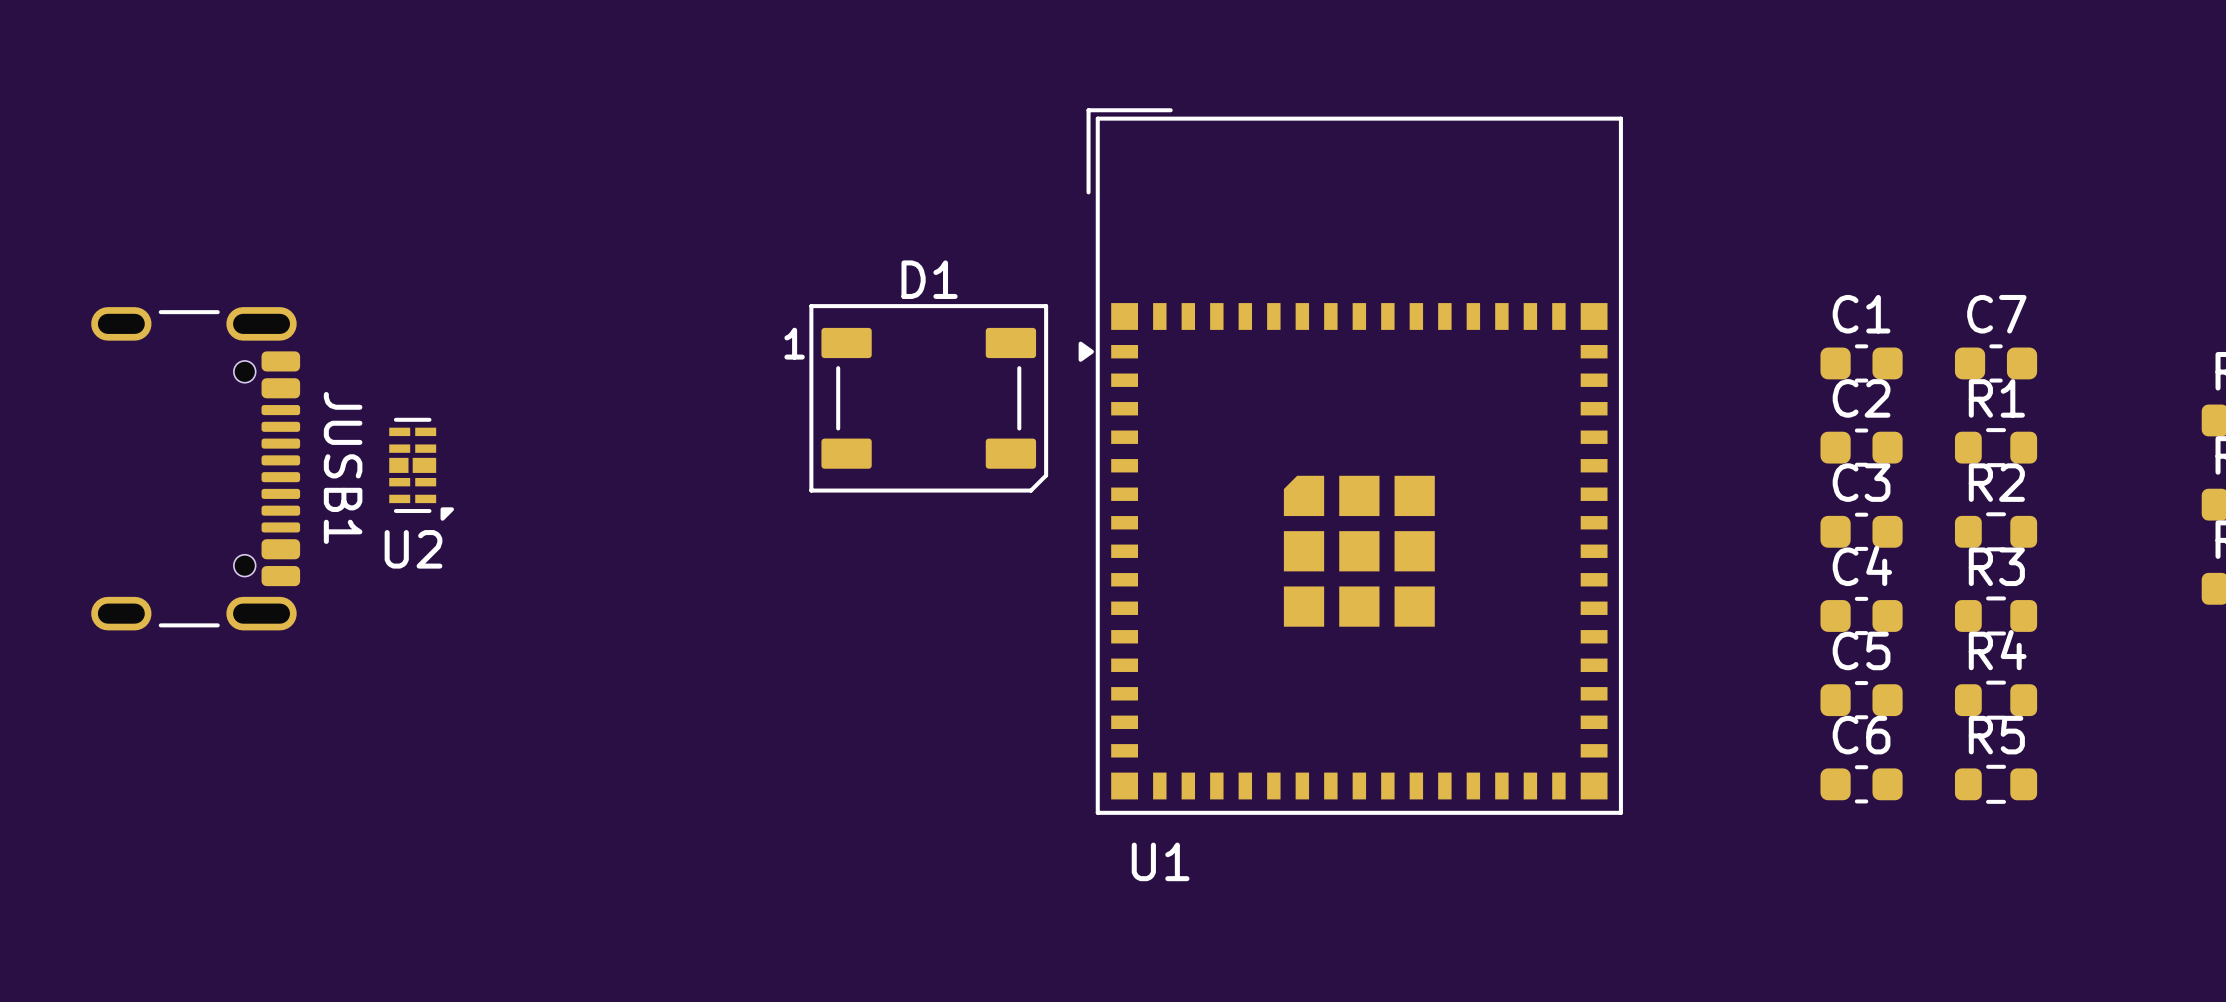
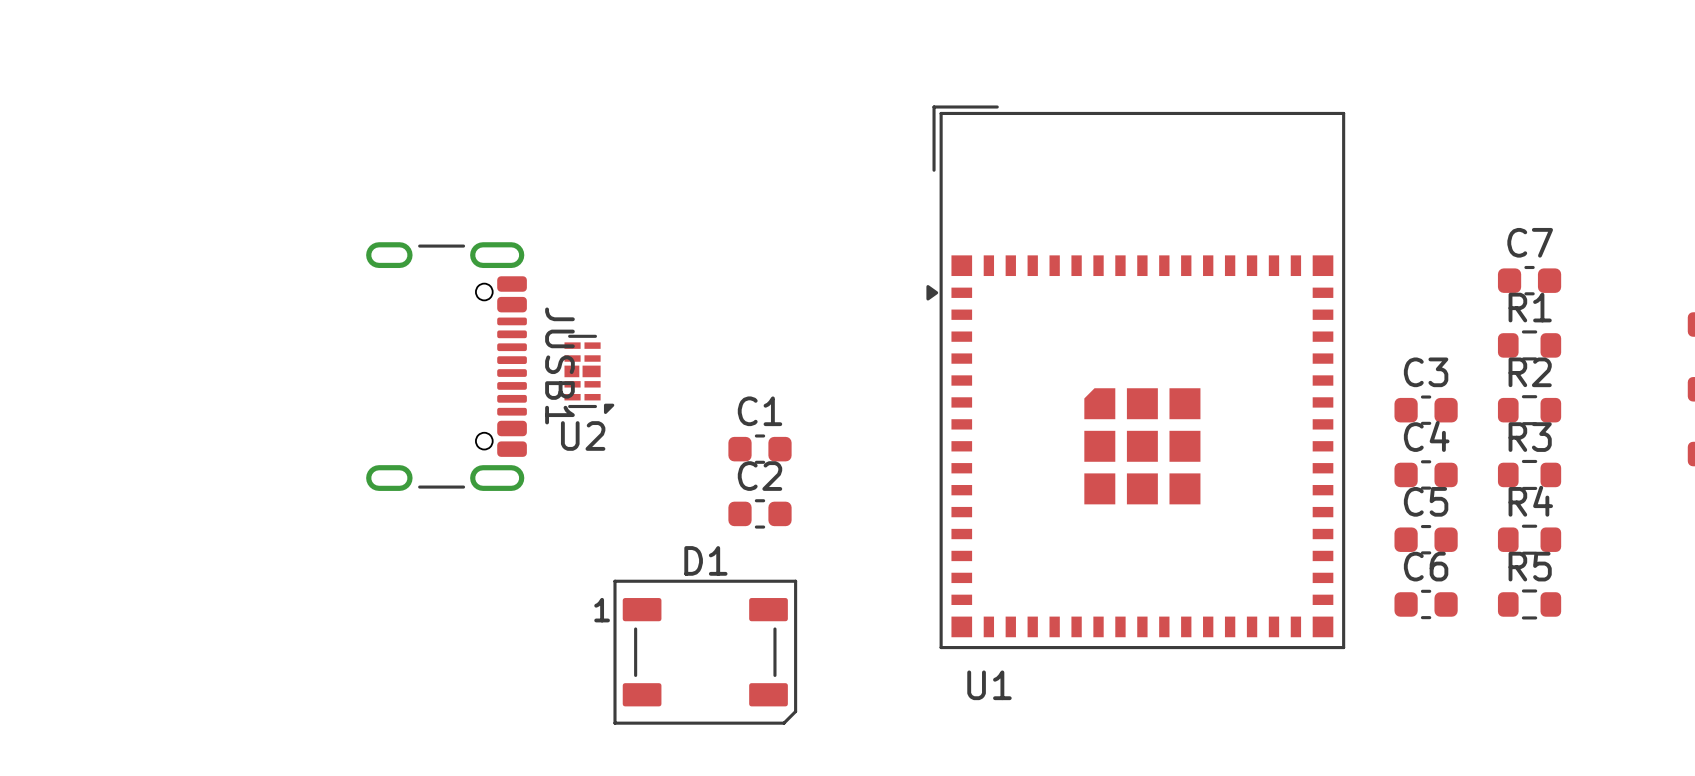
C1 position: (1861, 363) -> (760, 449)
D1 position: (928, 398) -> (705, 652)
C2 position: (1861, 447) -> (760, 513)
U1 position: (1350, 461) -> (1135, 377)
JUSB1 position: (195, 468) -> (446, 366)
U2 position: (421, 469) -> (589, 374)

